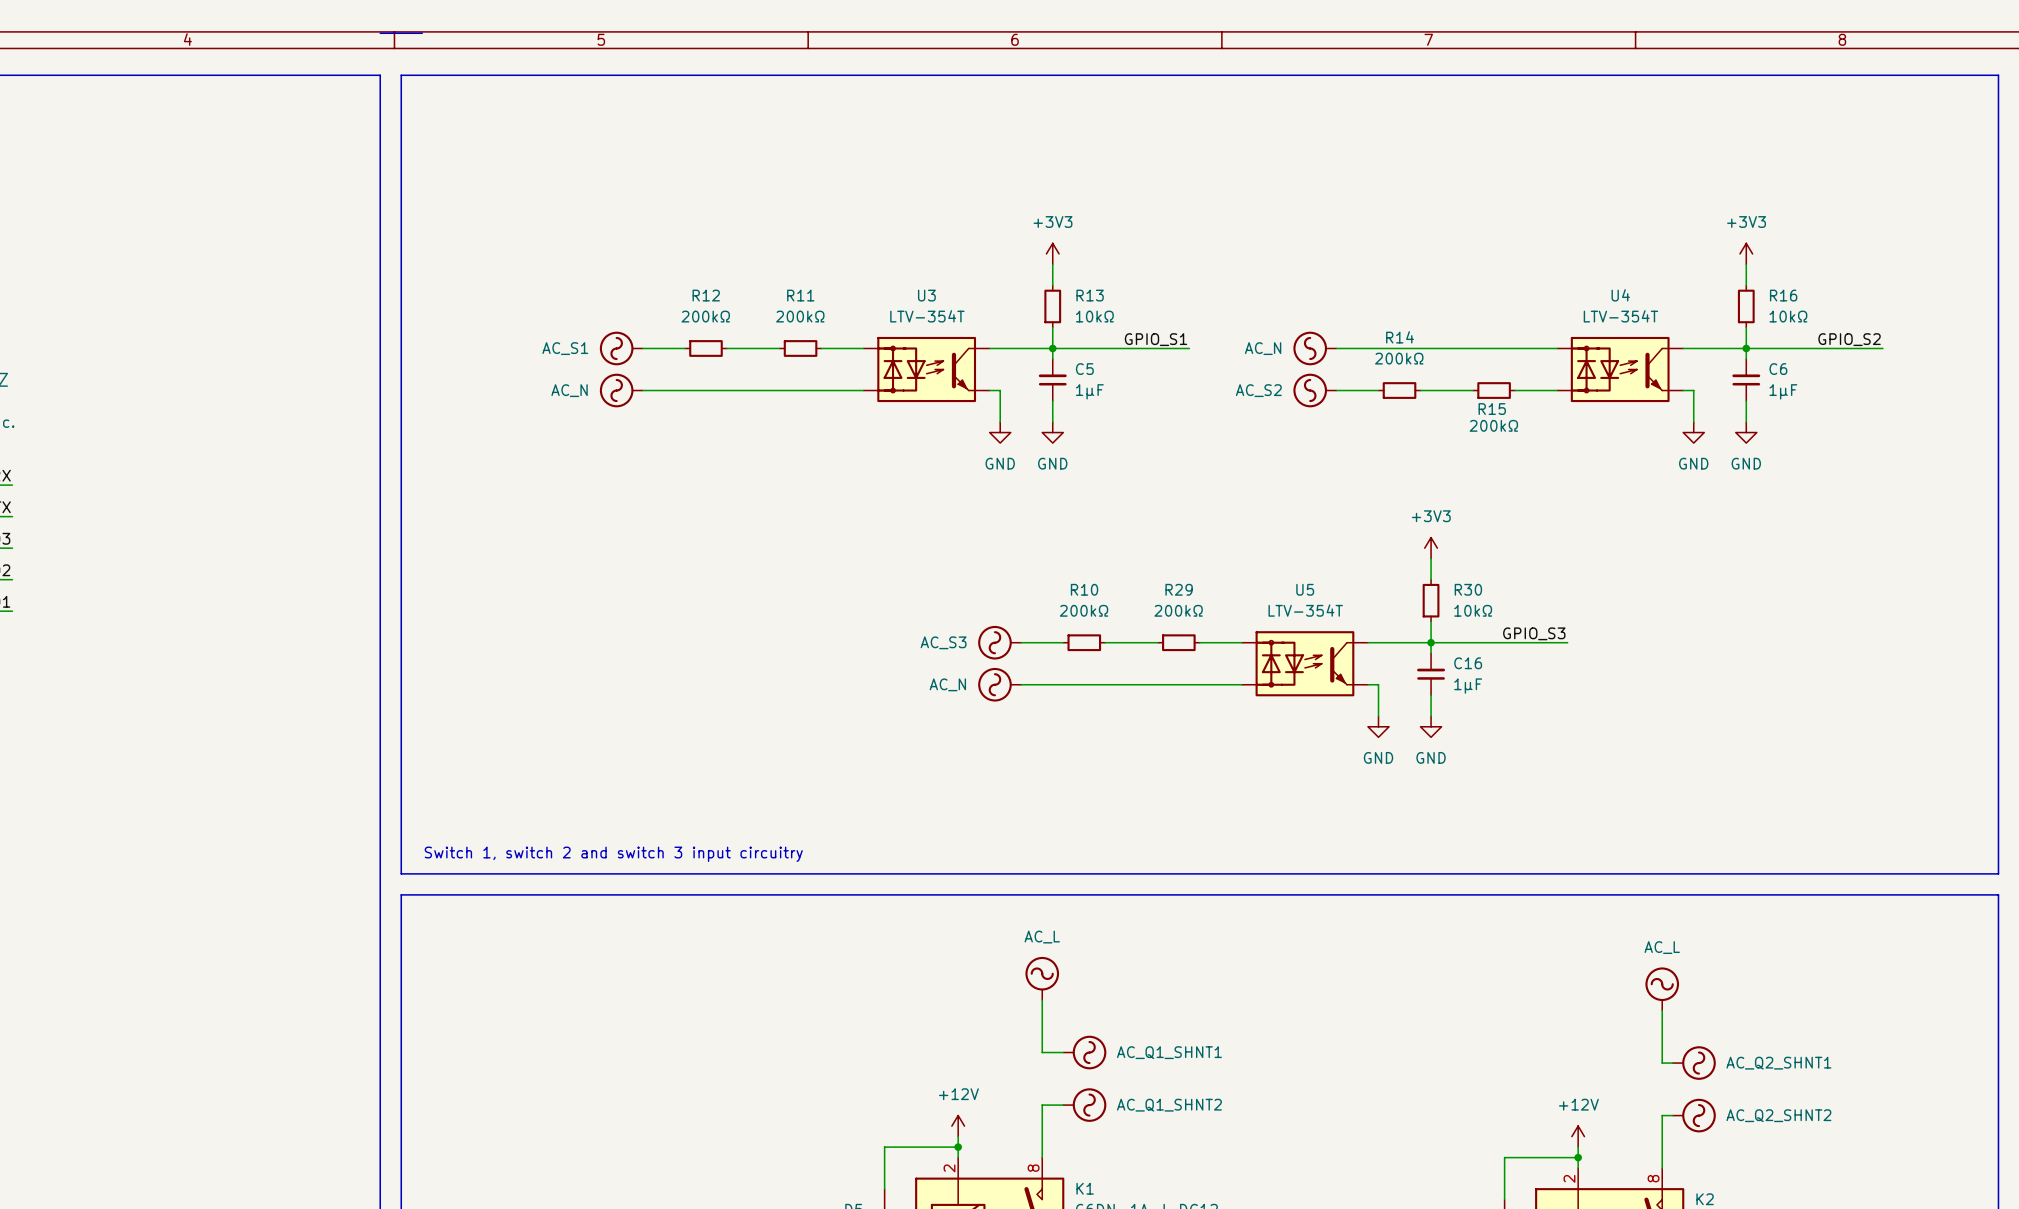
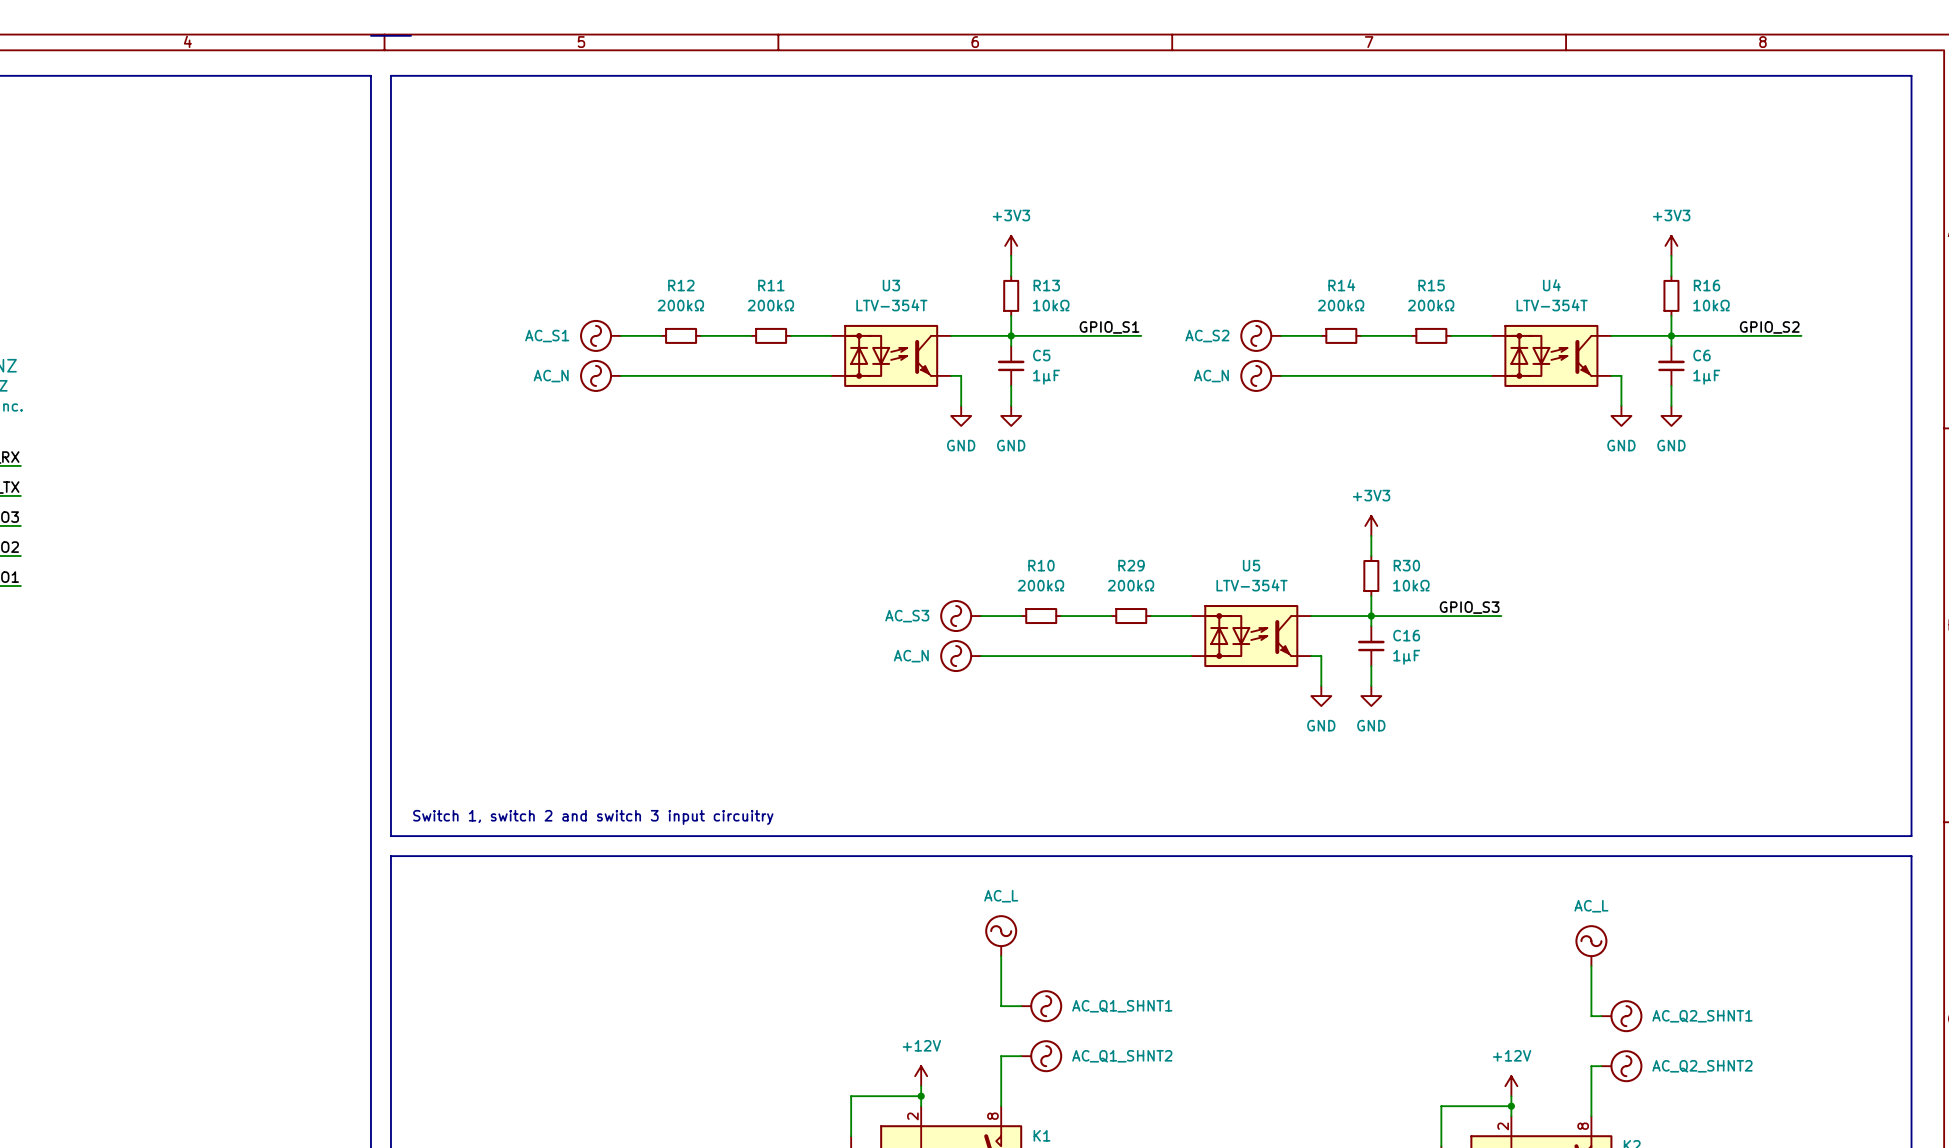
power symbol: AC_N (1314, 348) -> AC_S2 (1260, 335)
wire: (1378, 348) (1420, 348) -> (1321, 375) (1361, 375)
wire: (1473, 348) (1515, 348) -> (1411, 375) (1451, 375)
power symbol: AC_S2 (1314, 390) -> AC_N (1260, 375)
R14 position: (1399, 390) -> (1341, 335)
R15 position: (1494, 390) -> (1431, 335)
R15 name position: R15 (1492, 409) -> R15 (1431, 285)
R15 text position: 200kΩ (1493, 425) -> 200kΩ (1431, 305)

